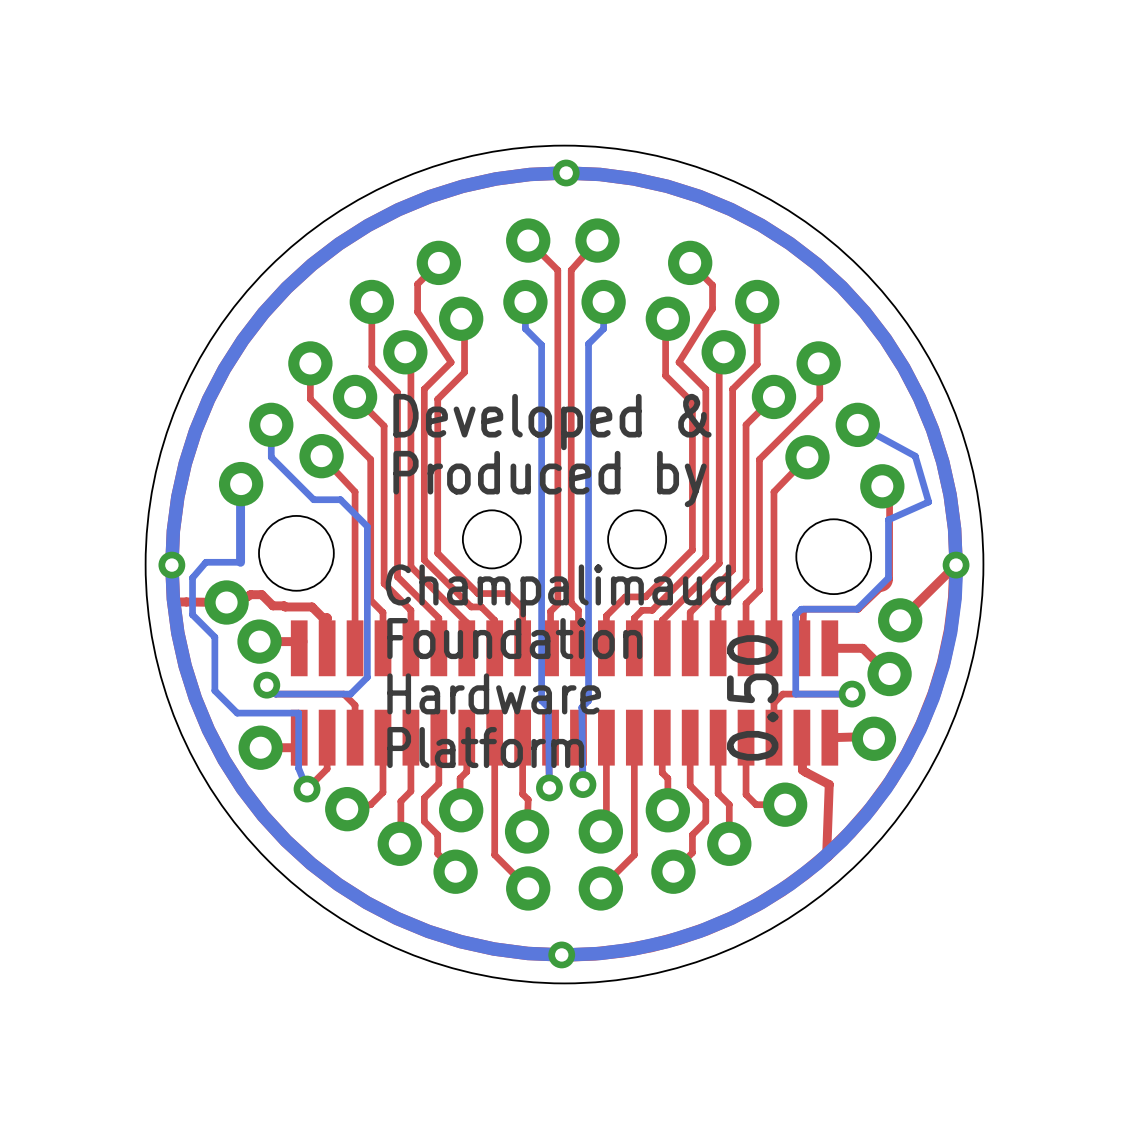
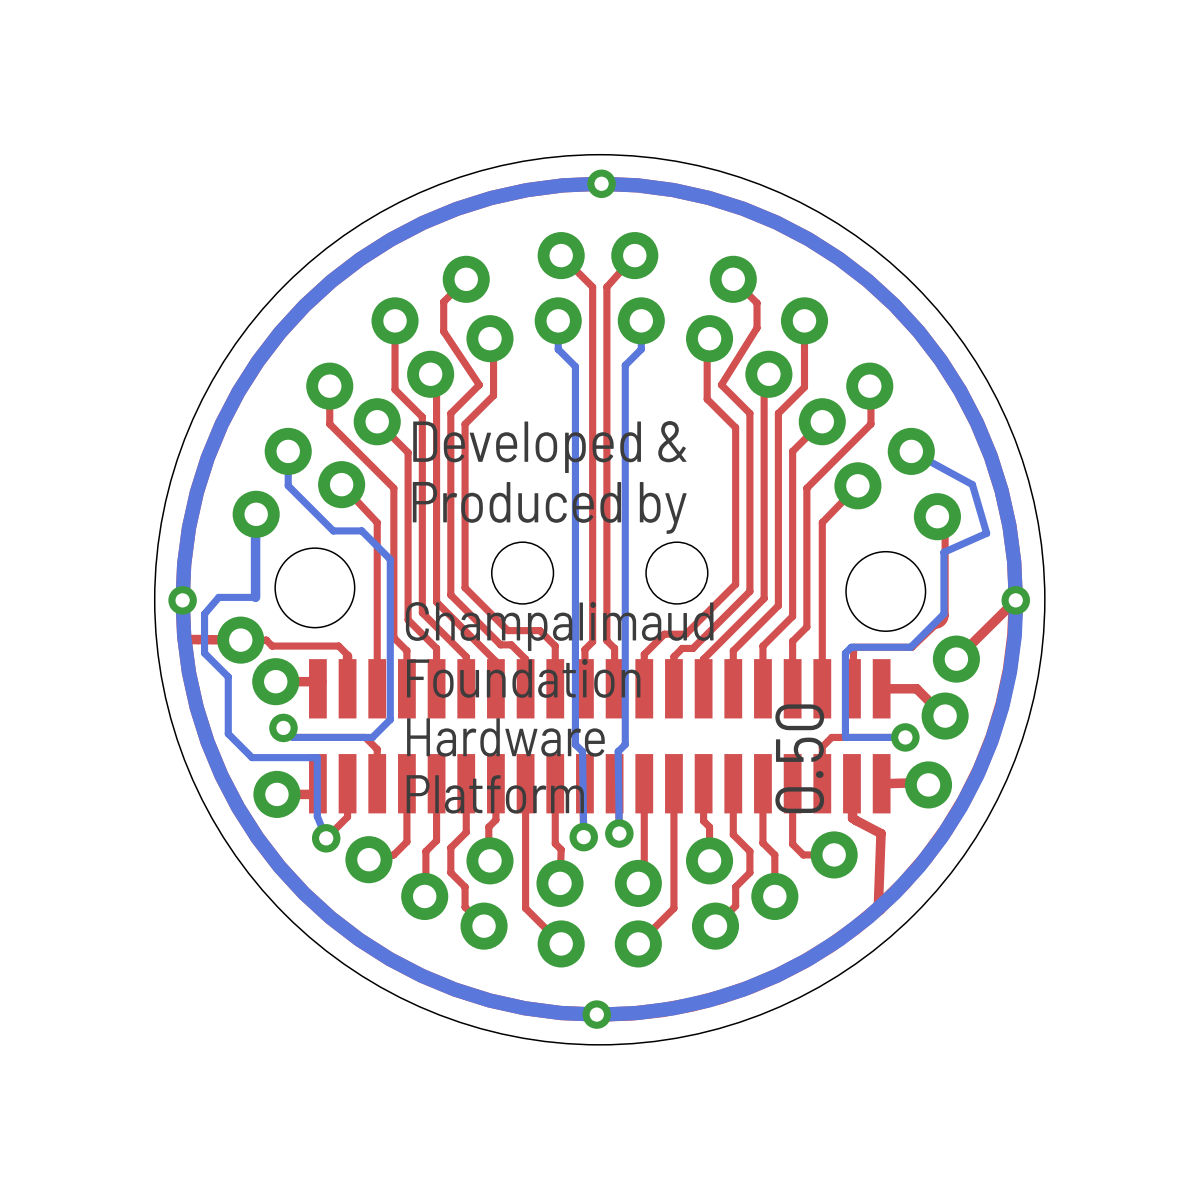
top track: (226, 602) (222, 596) (261, 594) (272, 605) (312, 606) (323, 618) (327, 618) -> (240, 640) (266, 640) (272, 646) (338, 646) (347, 656)

